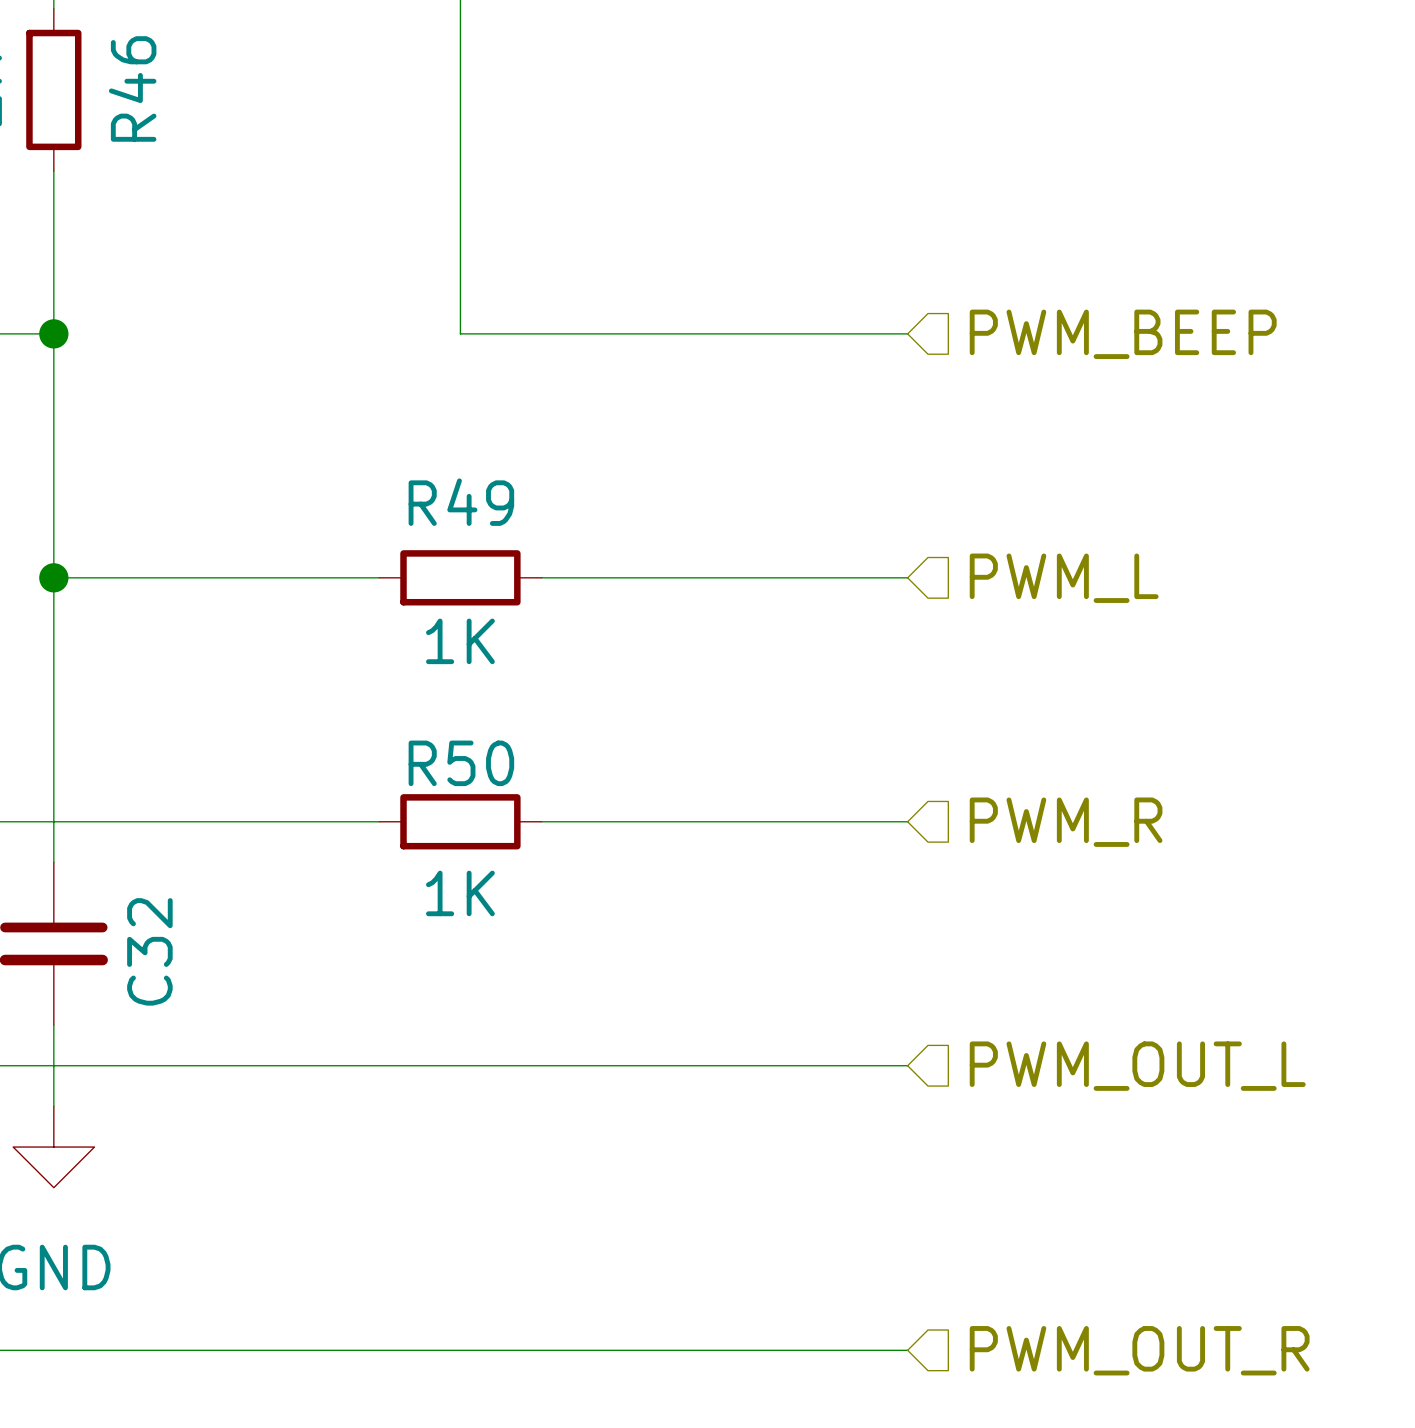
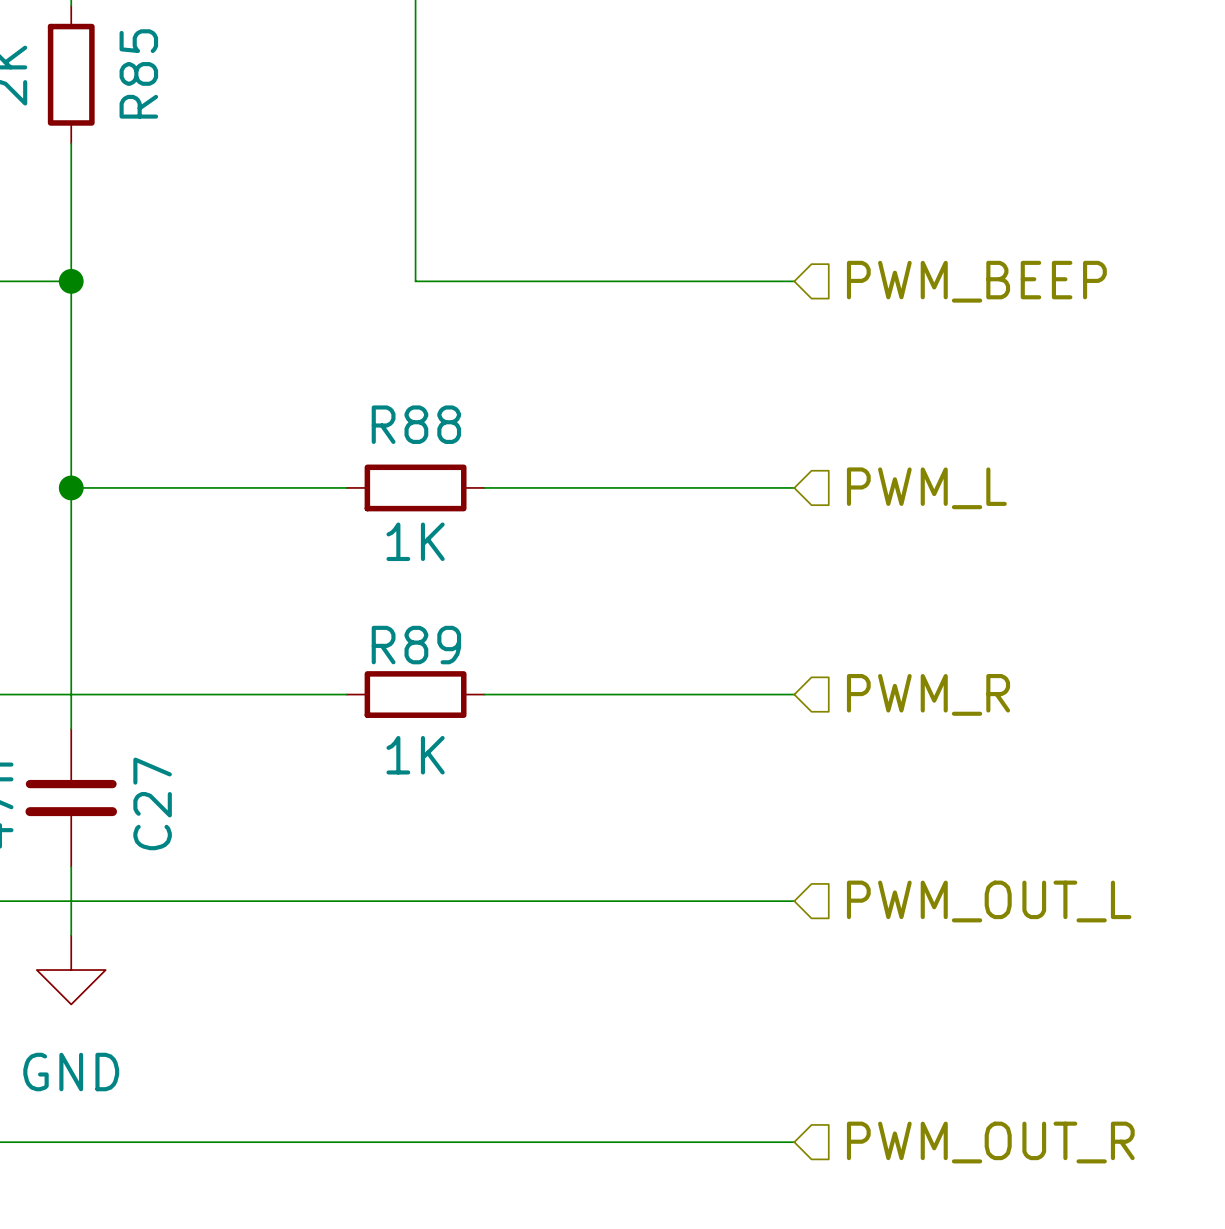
R46 name: R46 (132, 88) -> R85 (138, 73)
R49 name: R49 (461, 502) -> R88 (416, 424)
R50 name: R50 (461, 763) -> R89 (416, 645)
C32 name: C32 (149, 951) -> C27 (152, 803)

